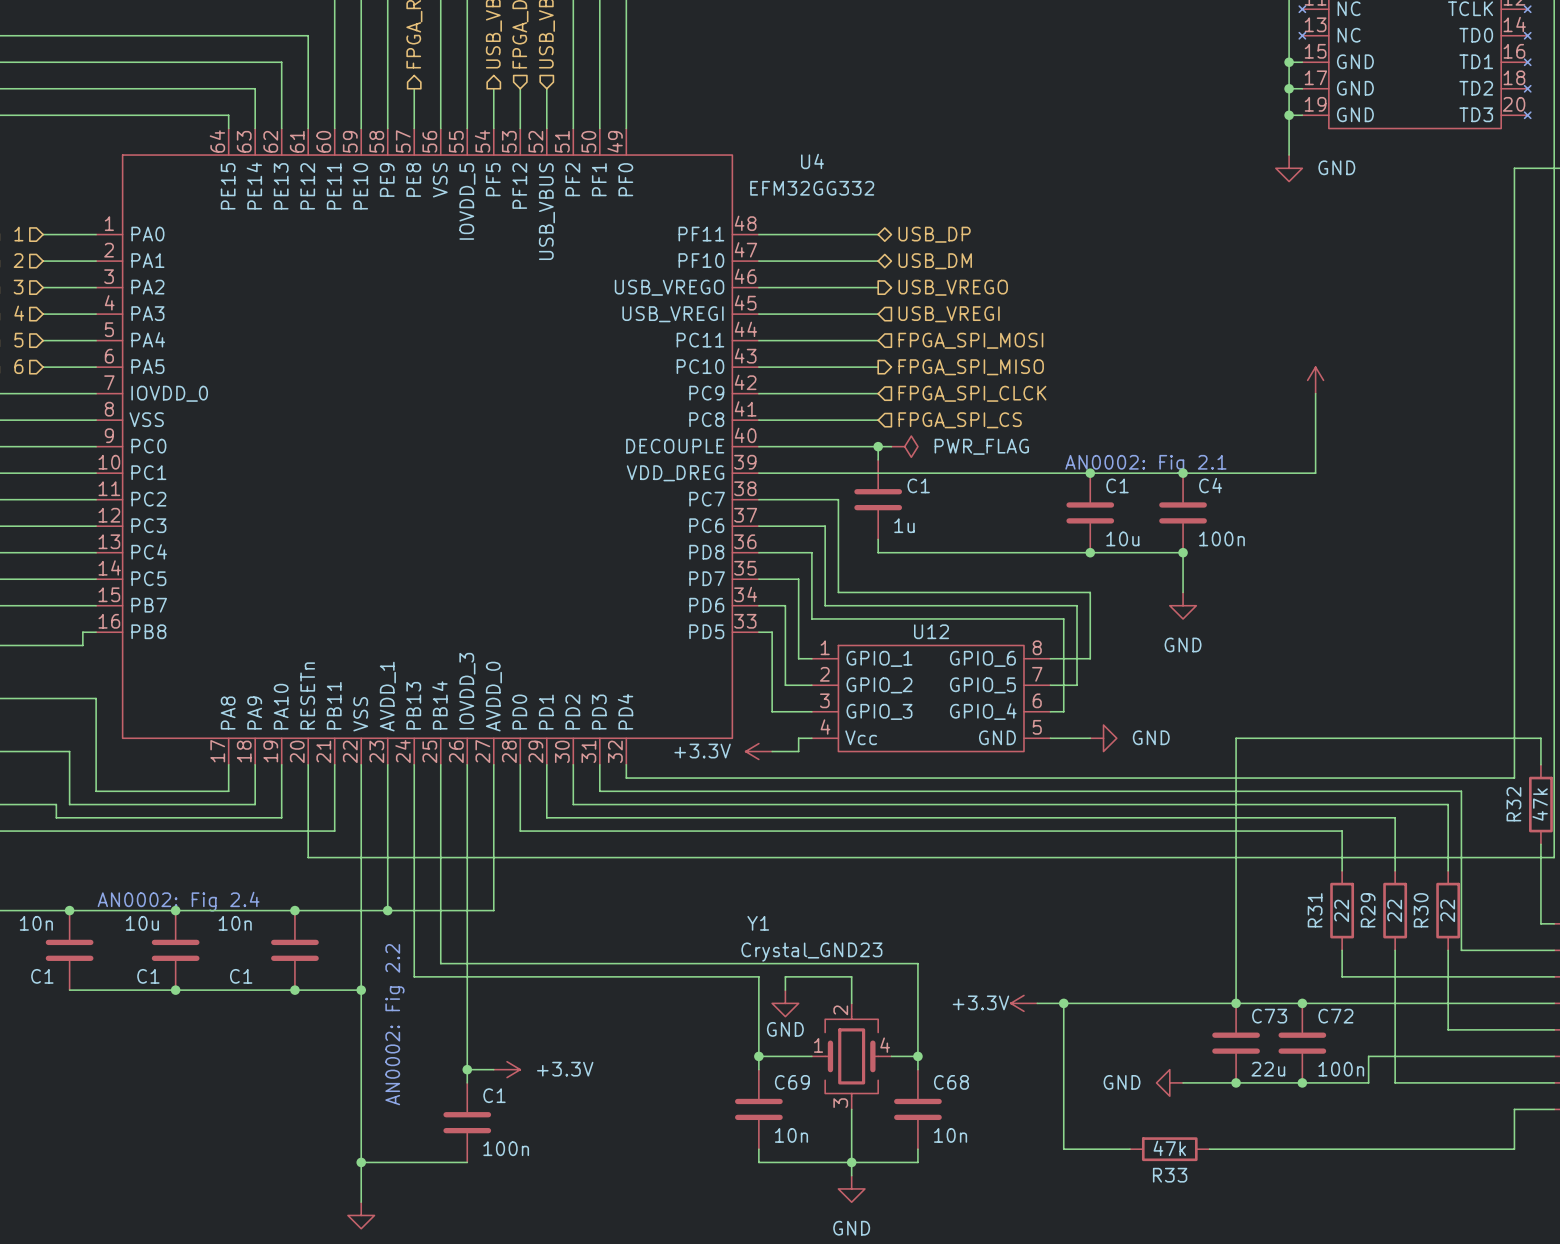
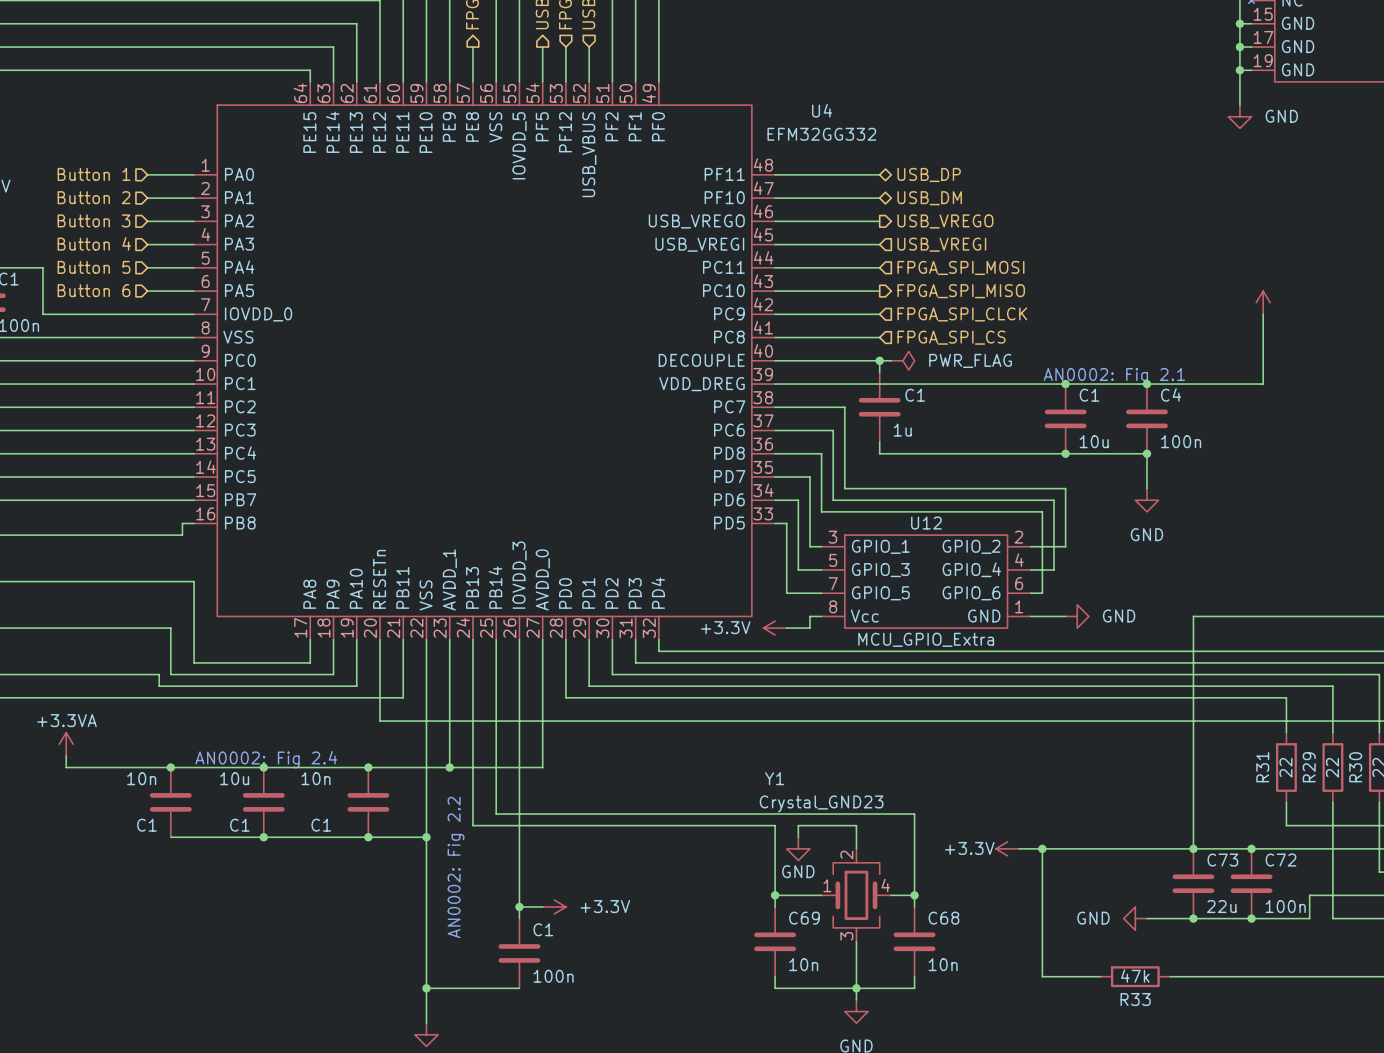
U12 symbol: [811, 645, 1051, 752] -> [821, 535, 1031, 629]
U12 value: none -> MCU_GPIO_Extra (926, 639)

